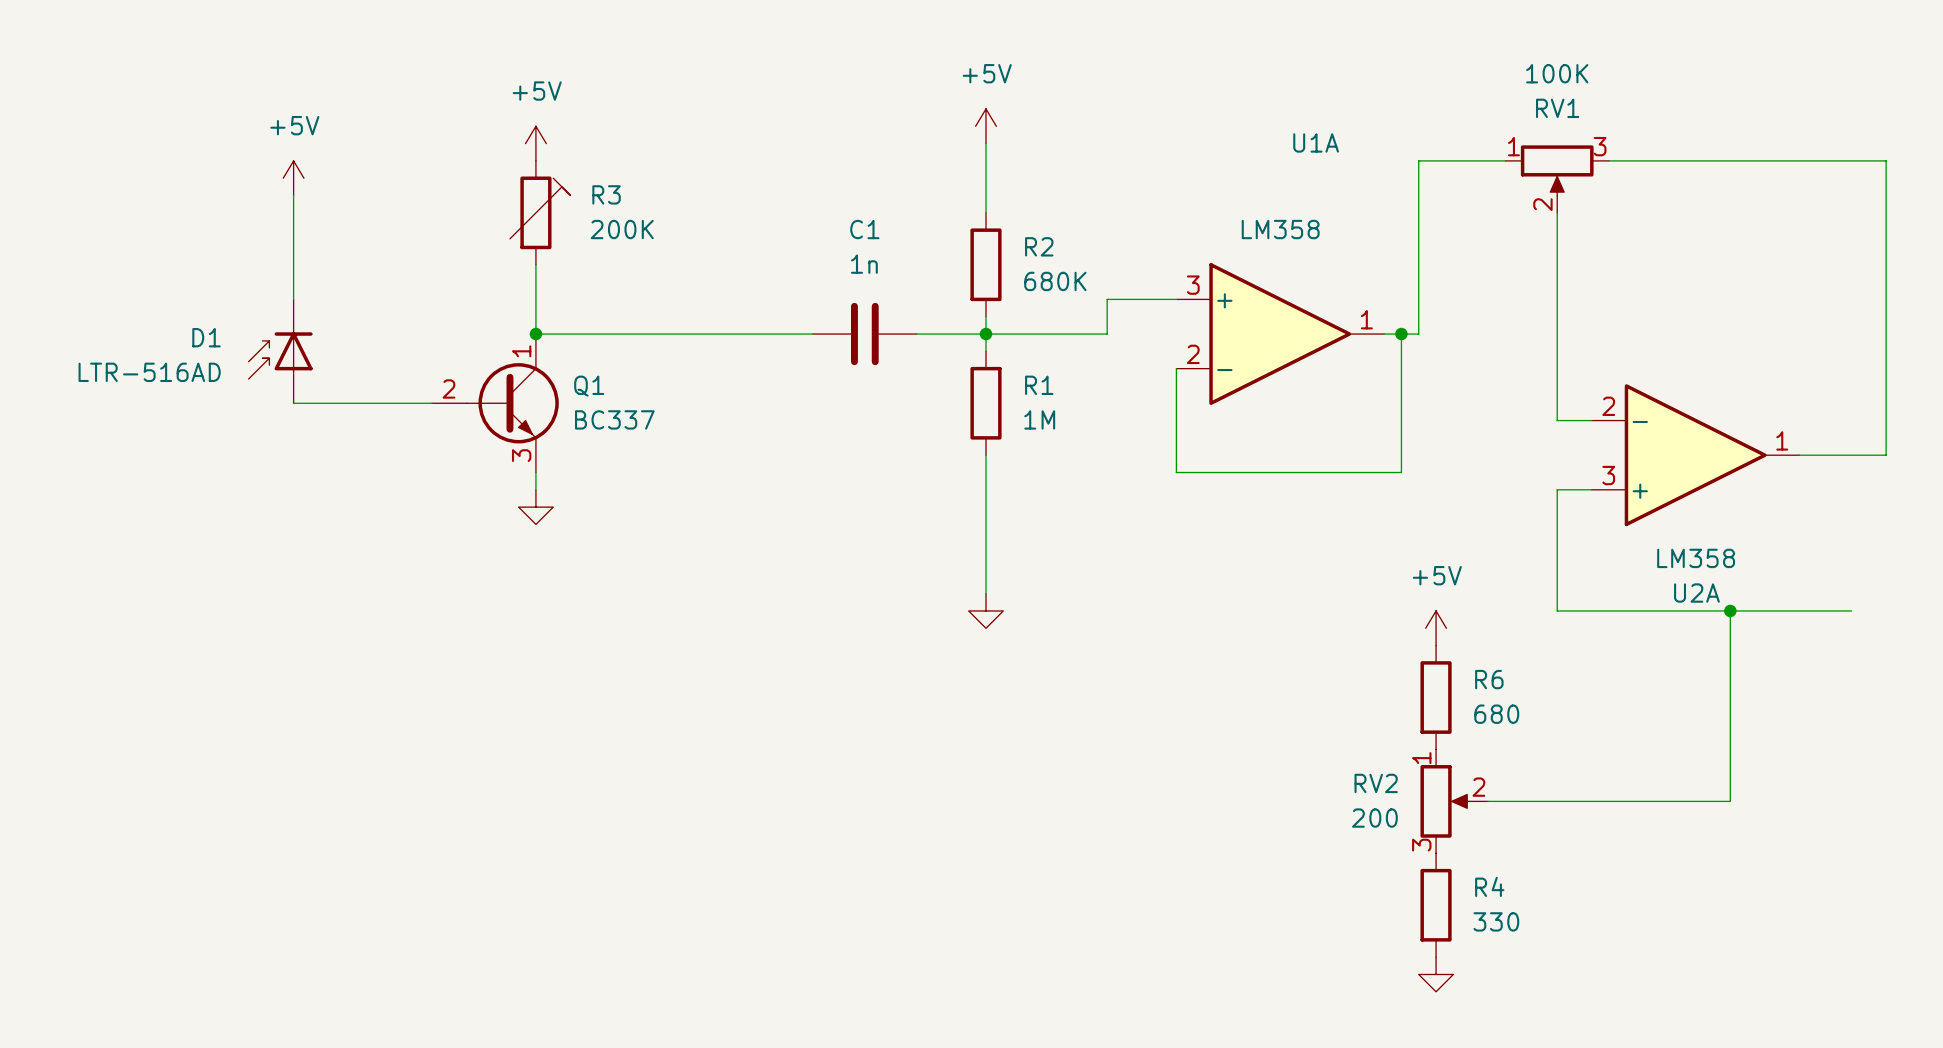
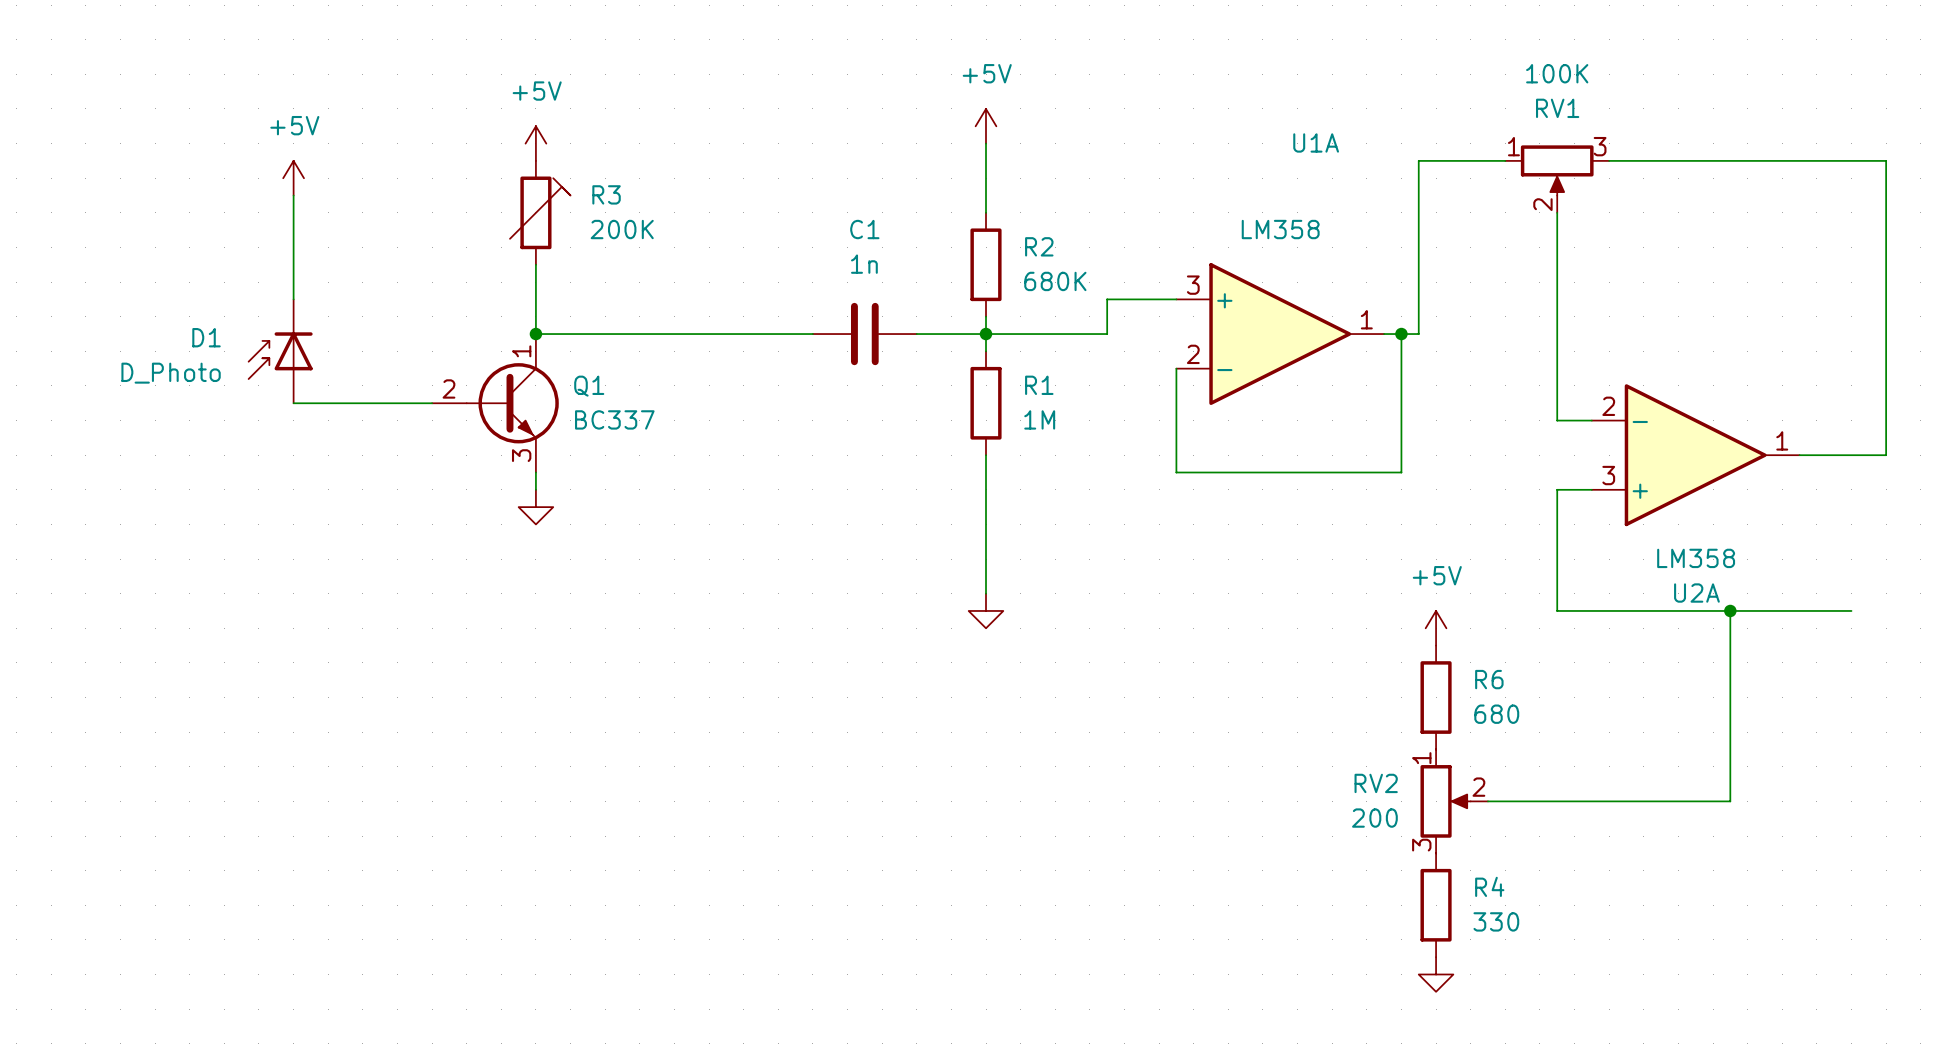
D1 value: LTR-516AD (149, 372) -> D_Photo (171, 373)

